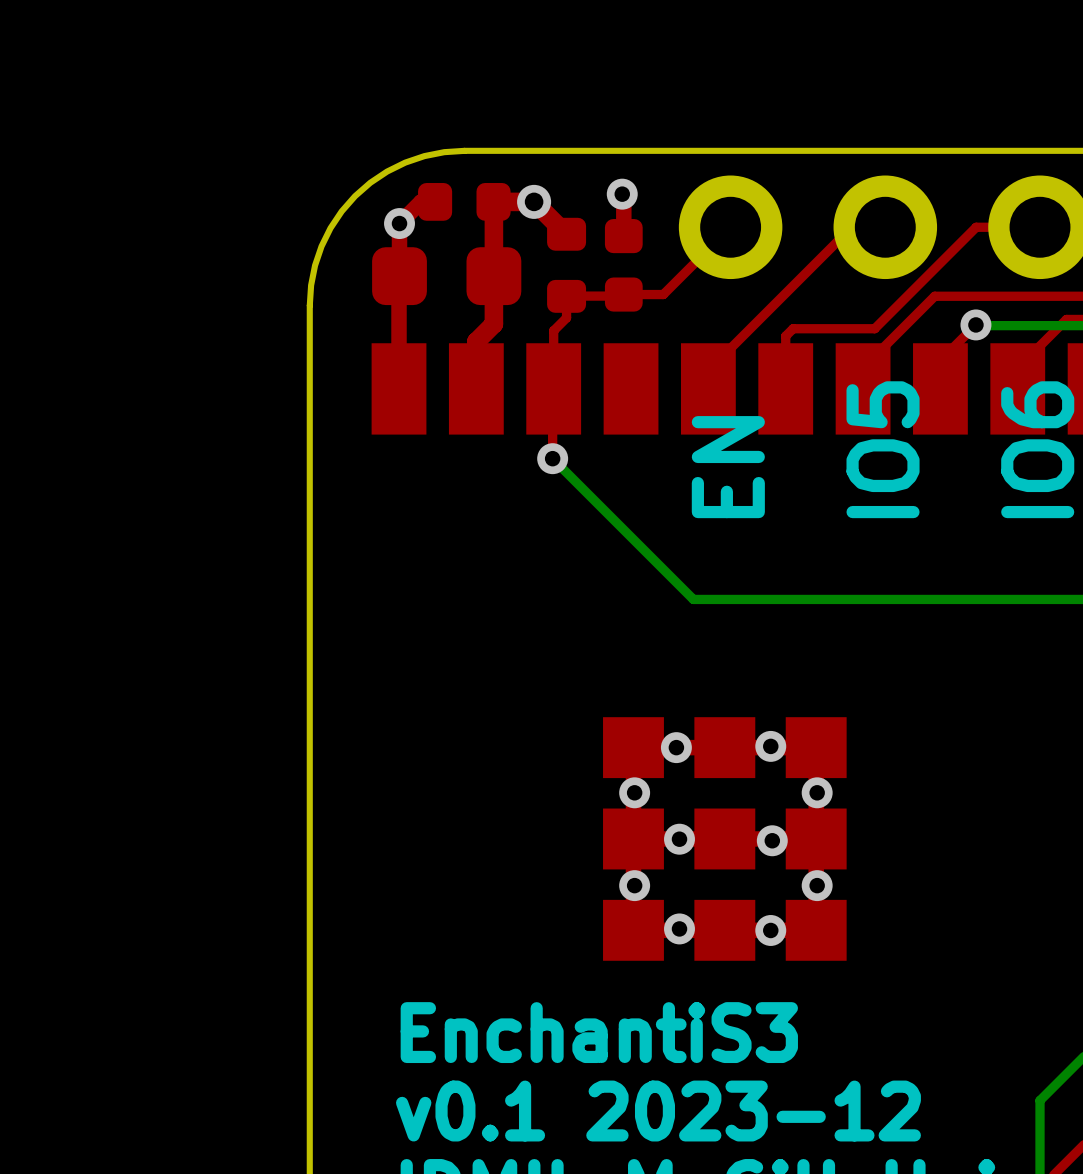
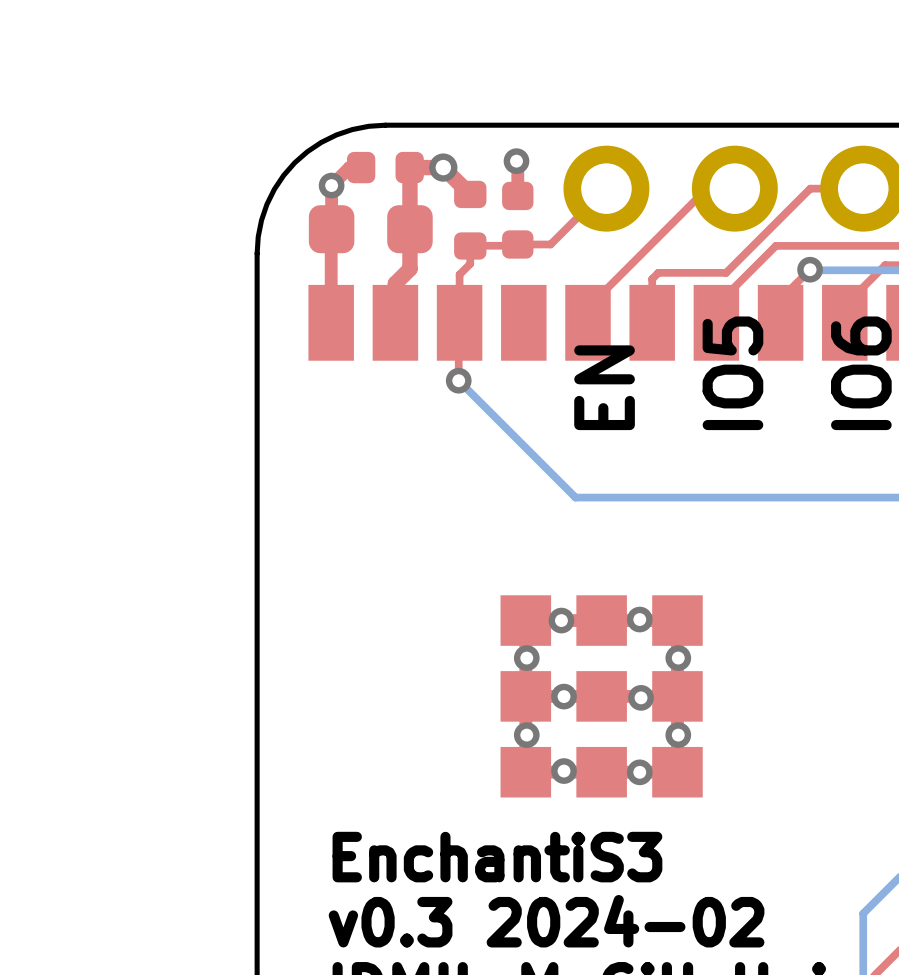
text: v0.1 2023-12 (658, 1111) -> v0.3 2024-02 (546, 921)

